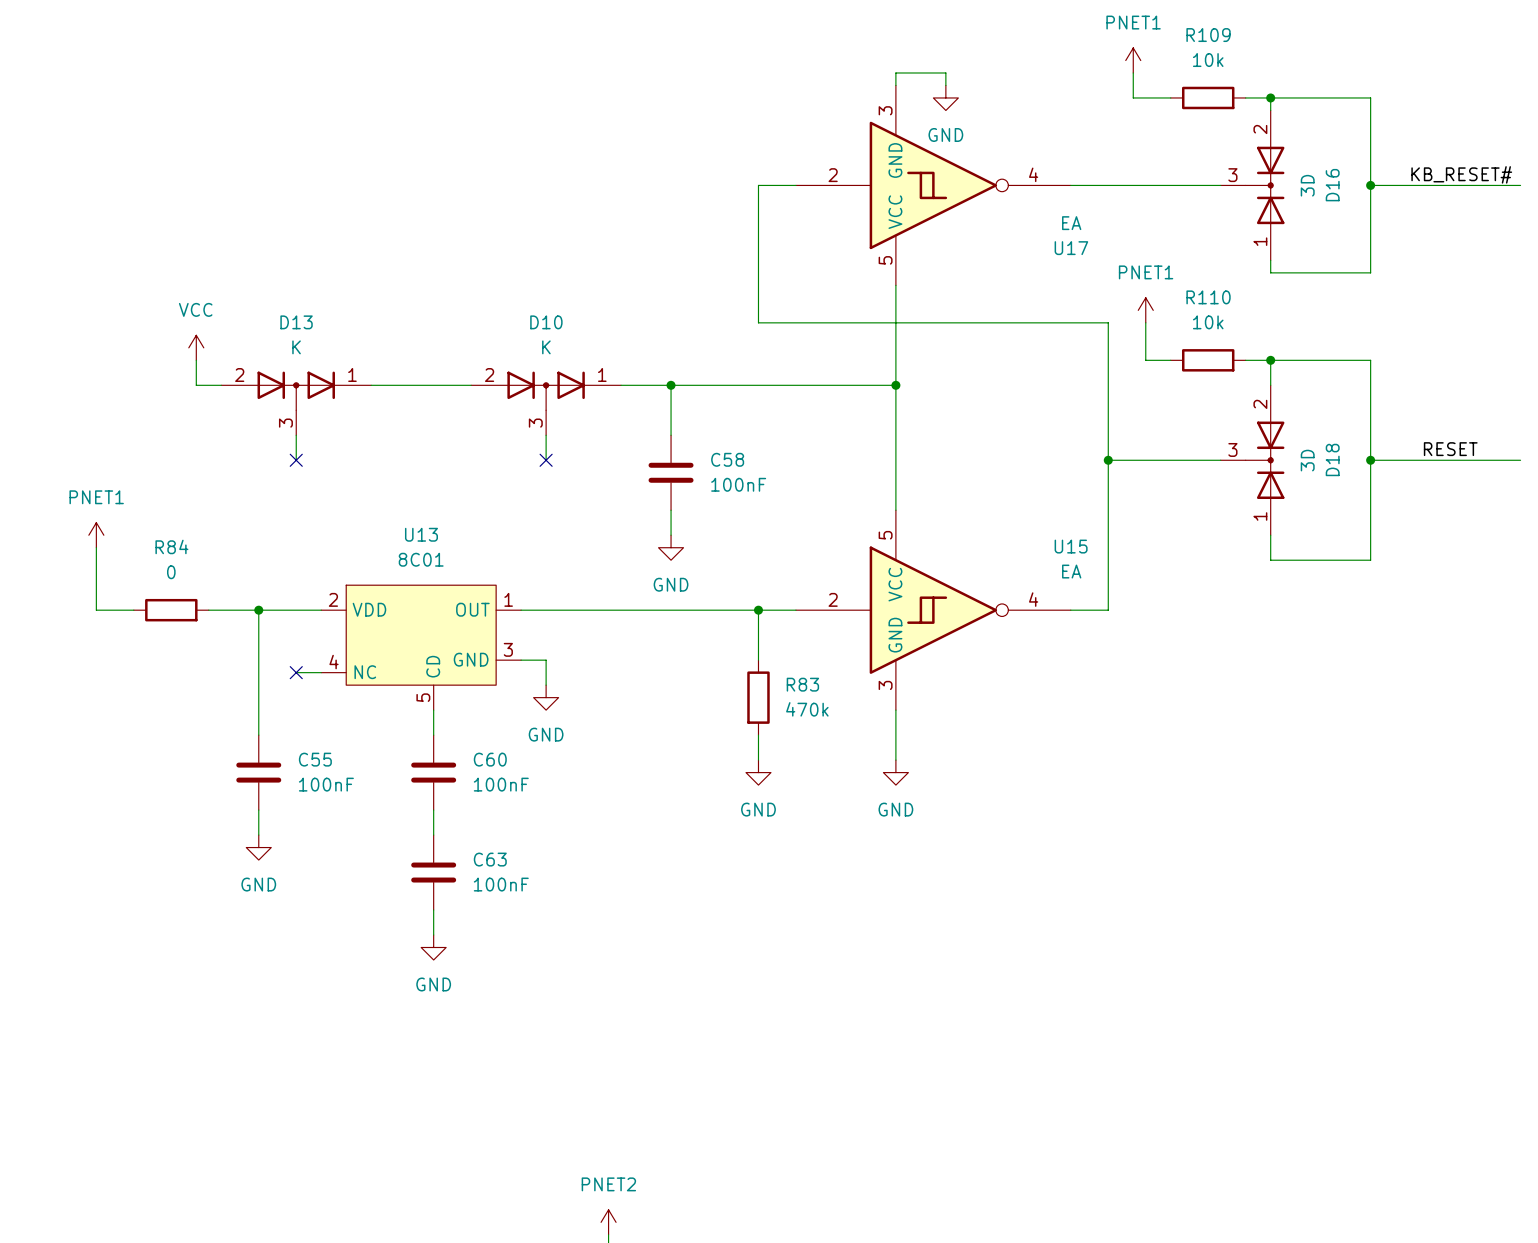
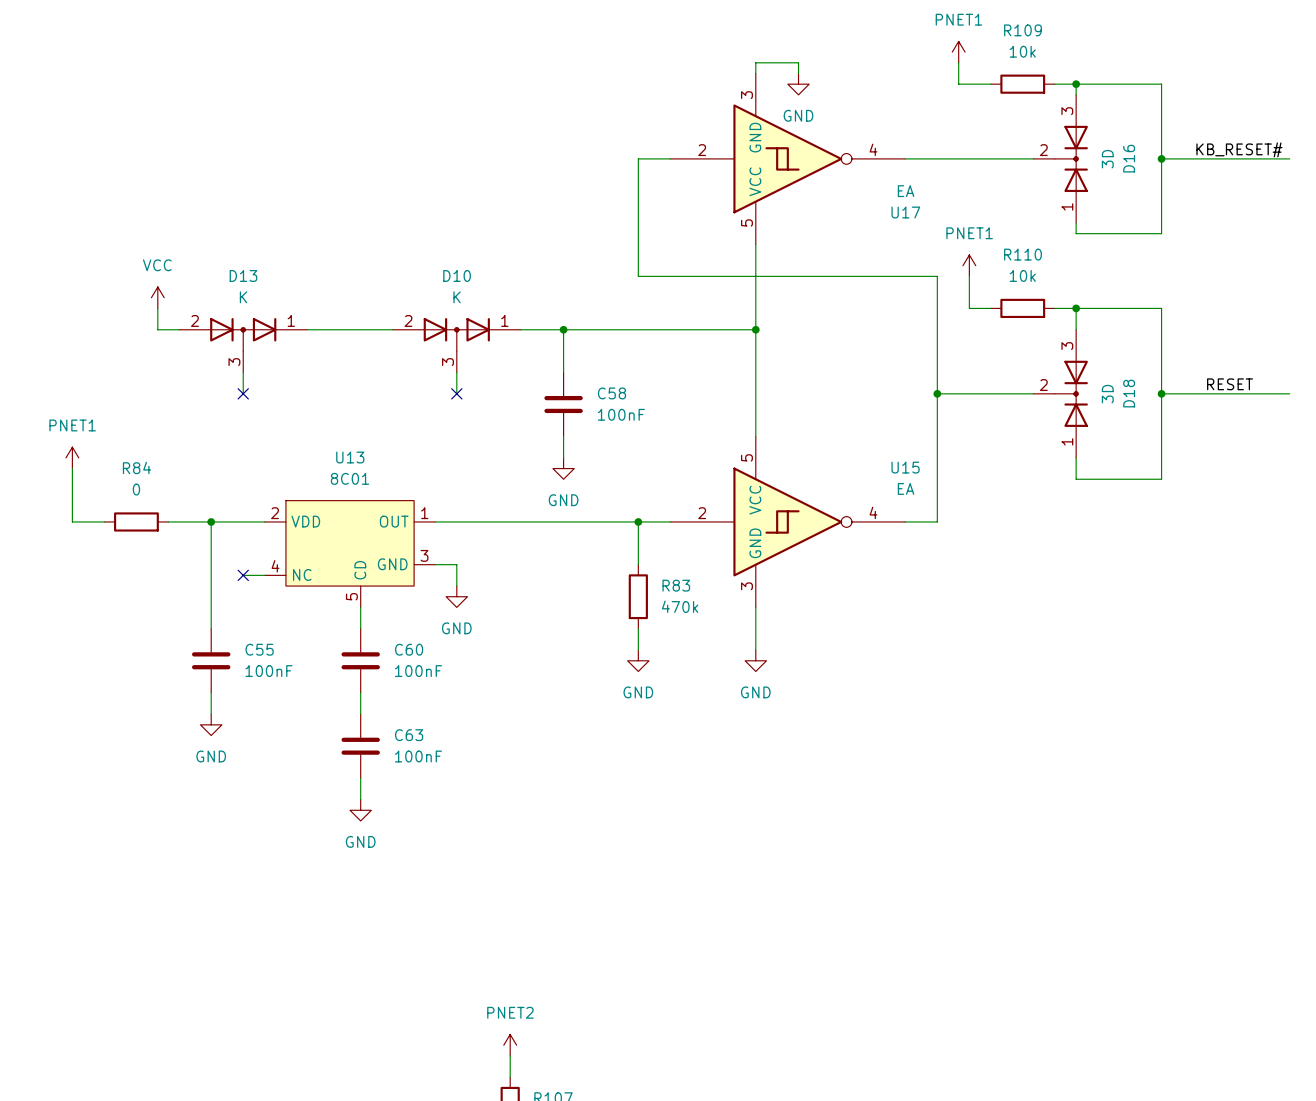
D16 pin number: 2 (1260, 129) -> 3 (1067, 111)
D16 pin number: 3 (1232, 175) -> 2 (1043, 150)
D18 pin number: 2 (1260, 404) -> 3 (1067, 346)
D18 pin number: 3 (1232, 449) -> 2 (1043, 385)

